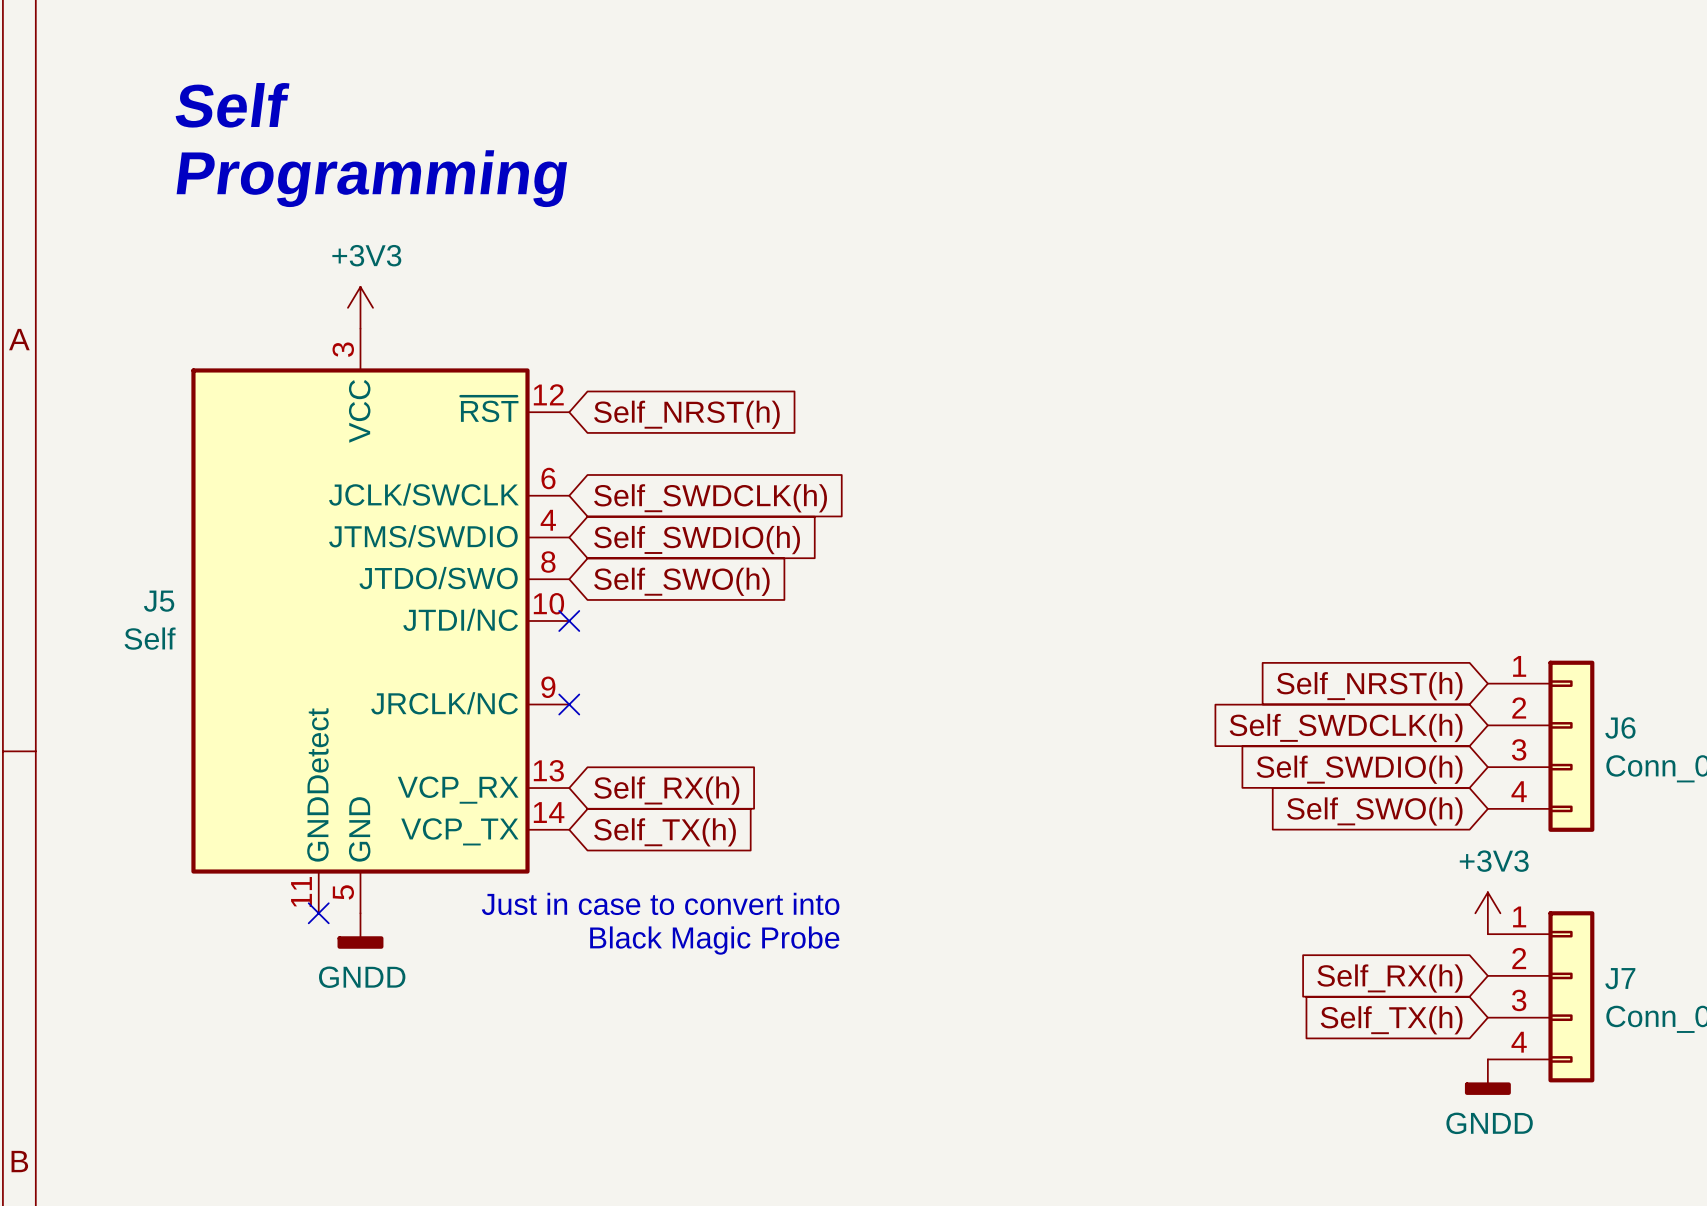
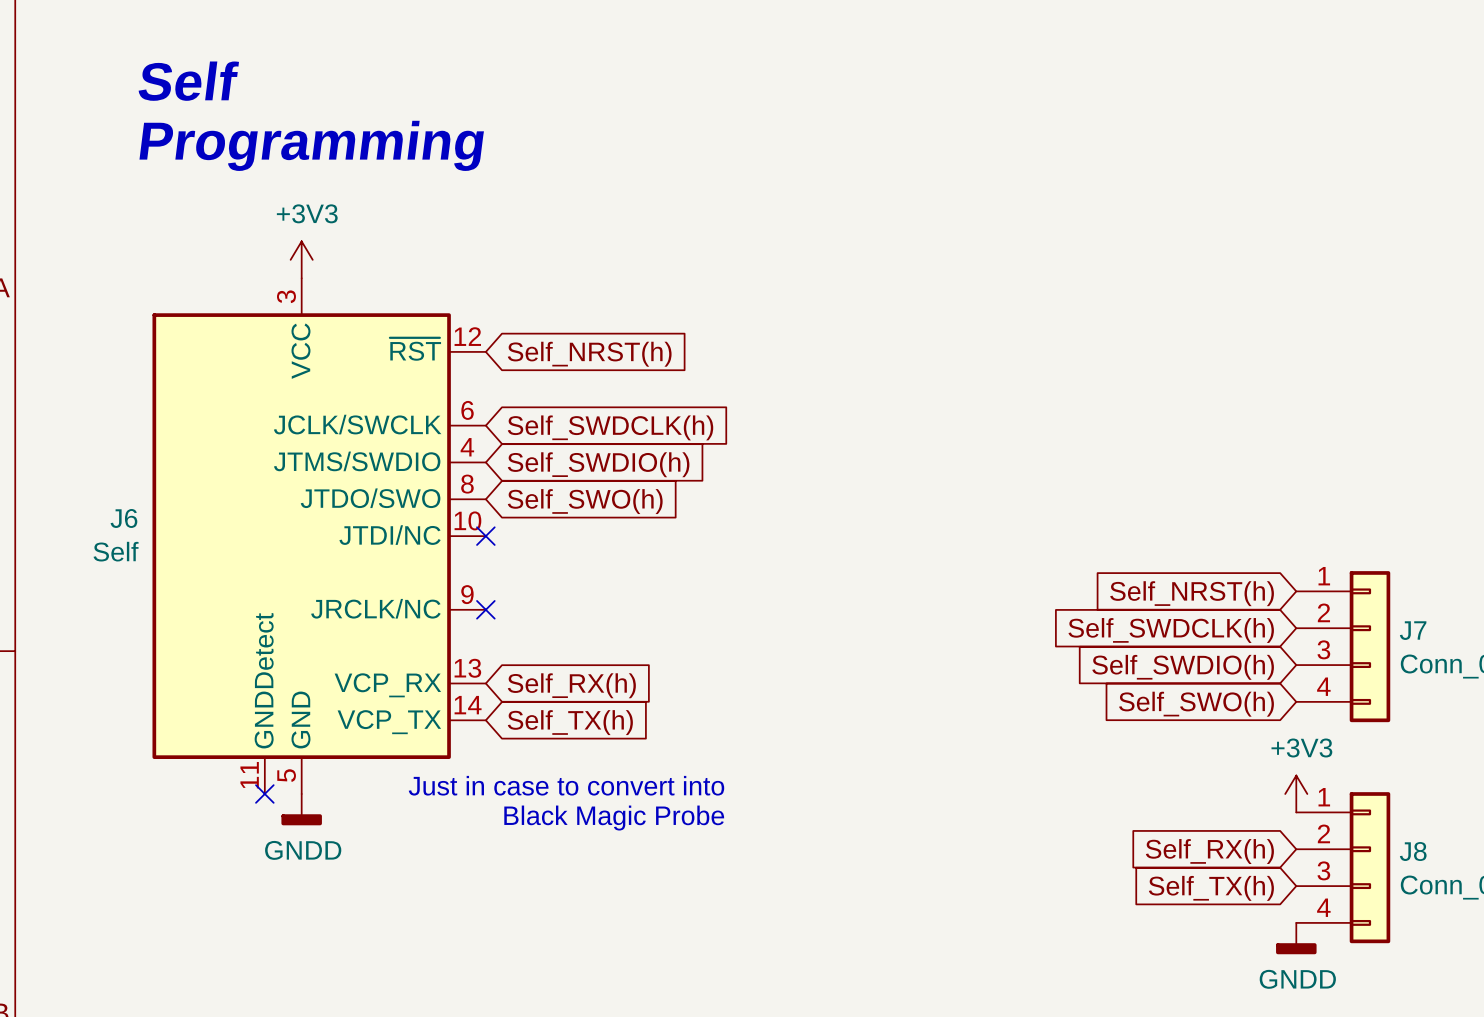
J5 name: J5 (159, 601) -> J6 (123, 518)
J6 name: J6 (1620, 727) -> J7 (1413, 630)
J7 name: J7 (1620, 978) -> J8 (1413, 851)

